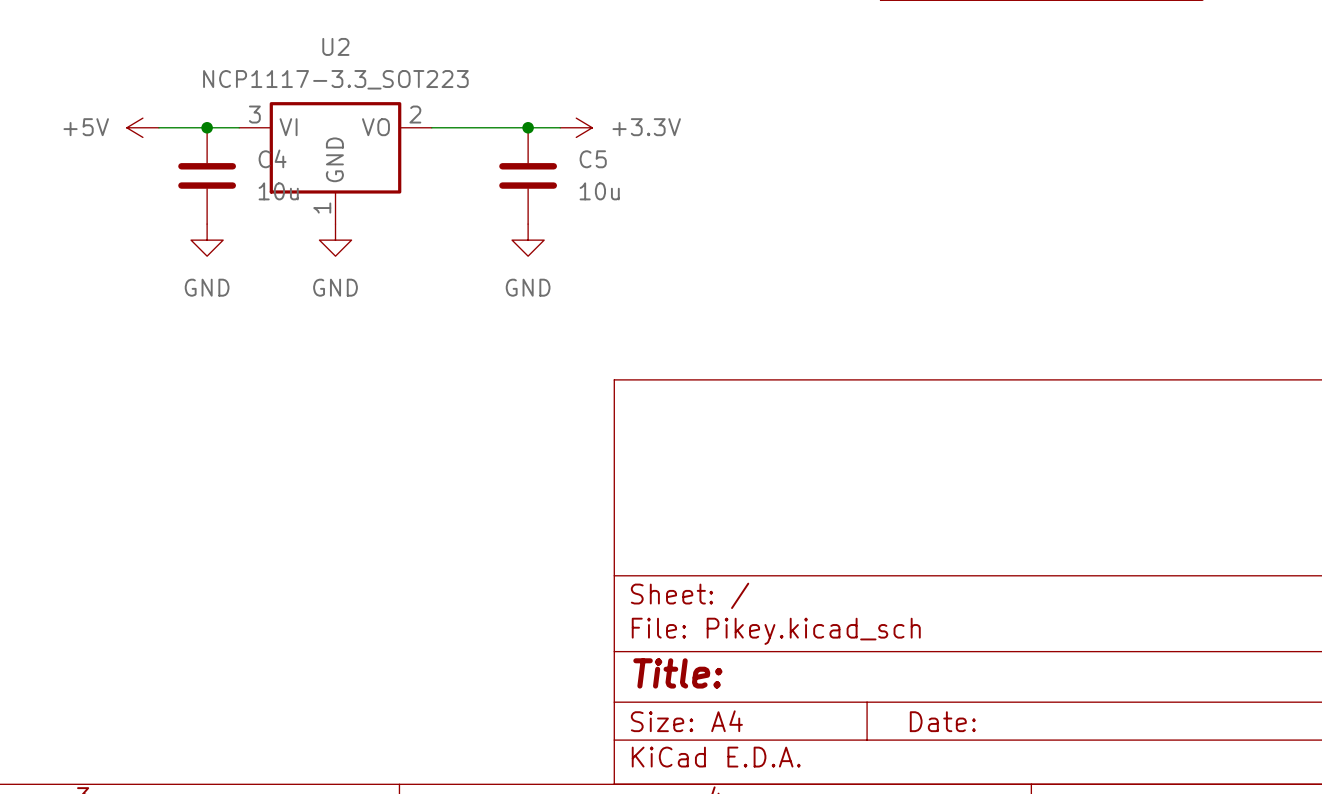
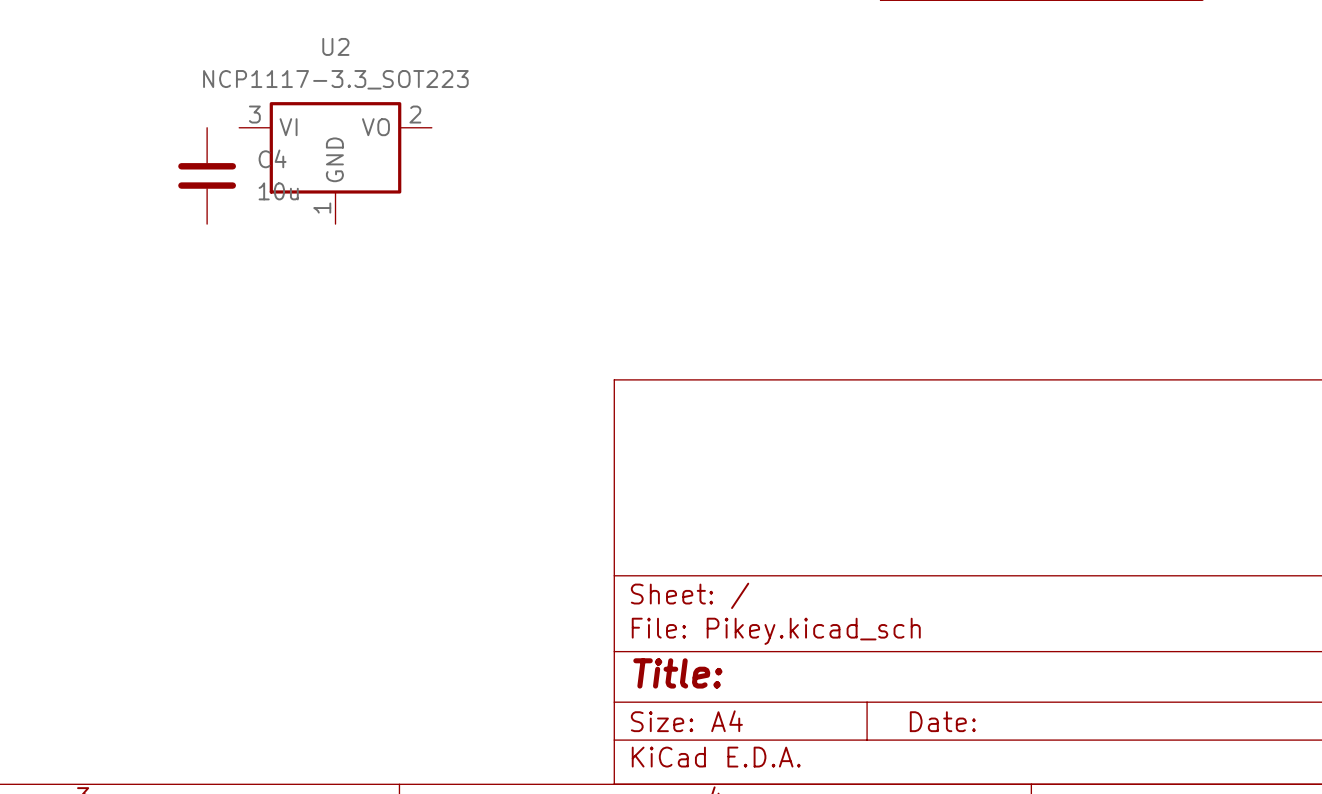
power symbol: +5V (142, 127) -> none
wire: (158, 127) (239, 127) -> none
junction: (207, 127) -> none
wire: (431, 127) (560, 127) -> none
junction: (528, 127) -> none
power symbol: +3.3V (576, 127) -> none
C5: 10u (528, 175) -> none
power symbol: GND (207, 240) -> none
power symbol: GND (335, 240) -> none
power symbol: GND (528, 240) -> none

